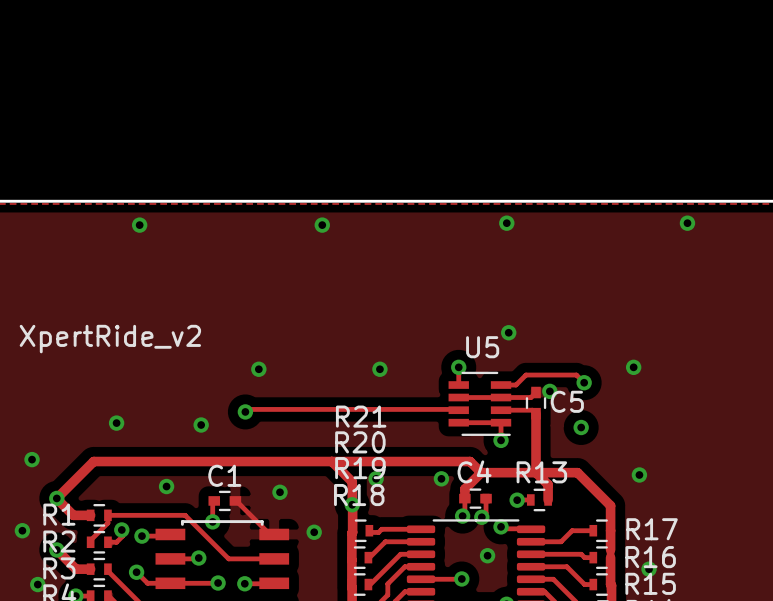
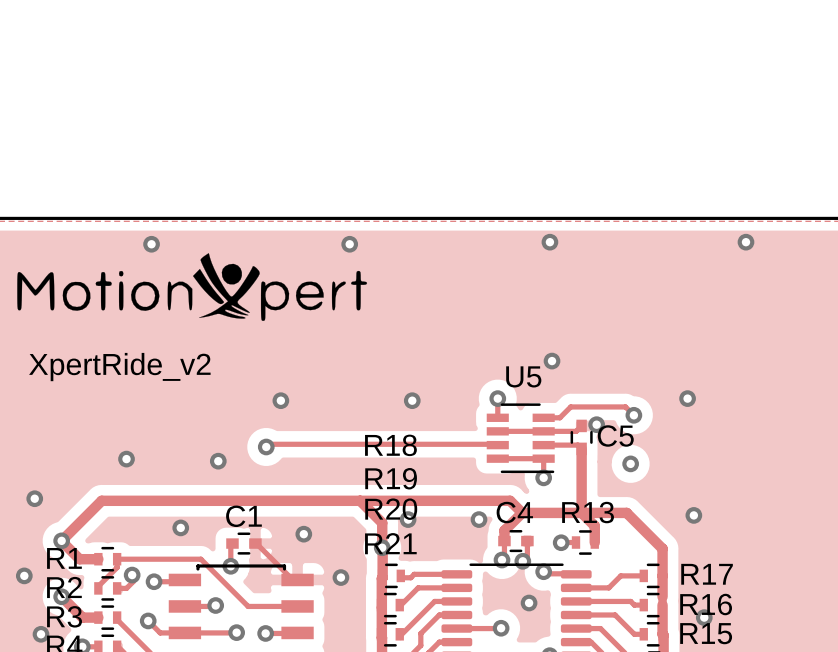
drawing: none -> [17, 253, 368, 321]
R21 name: R21 (361, 416) -> R18 (390, 445)
R20 name: R20 (360, 442) -> R19 (391, 478)
R19 name: R19 (360, 468) -> R20 (391, 509)
R18 name: R18 (359, 495) -> R21 (390, 543)

